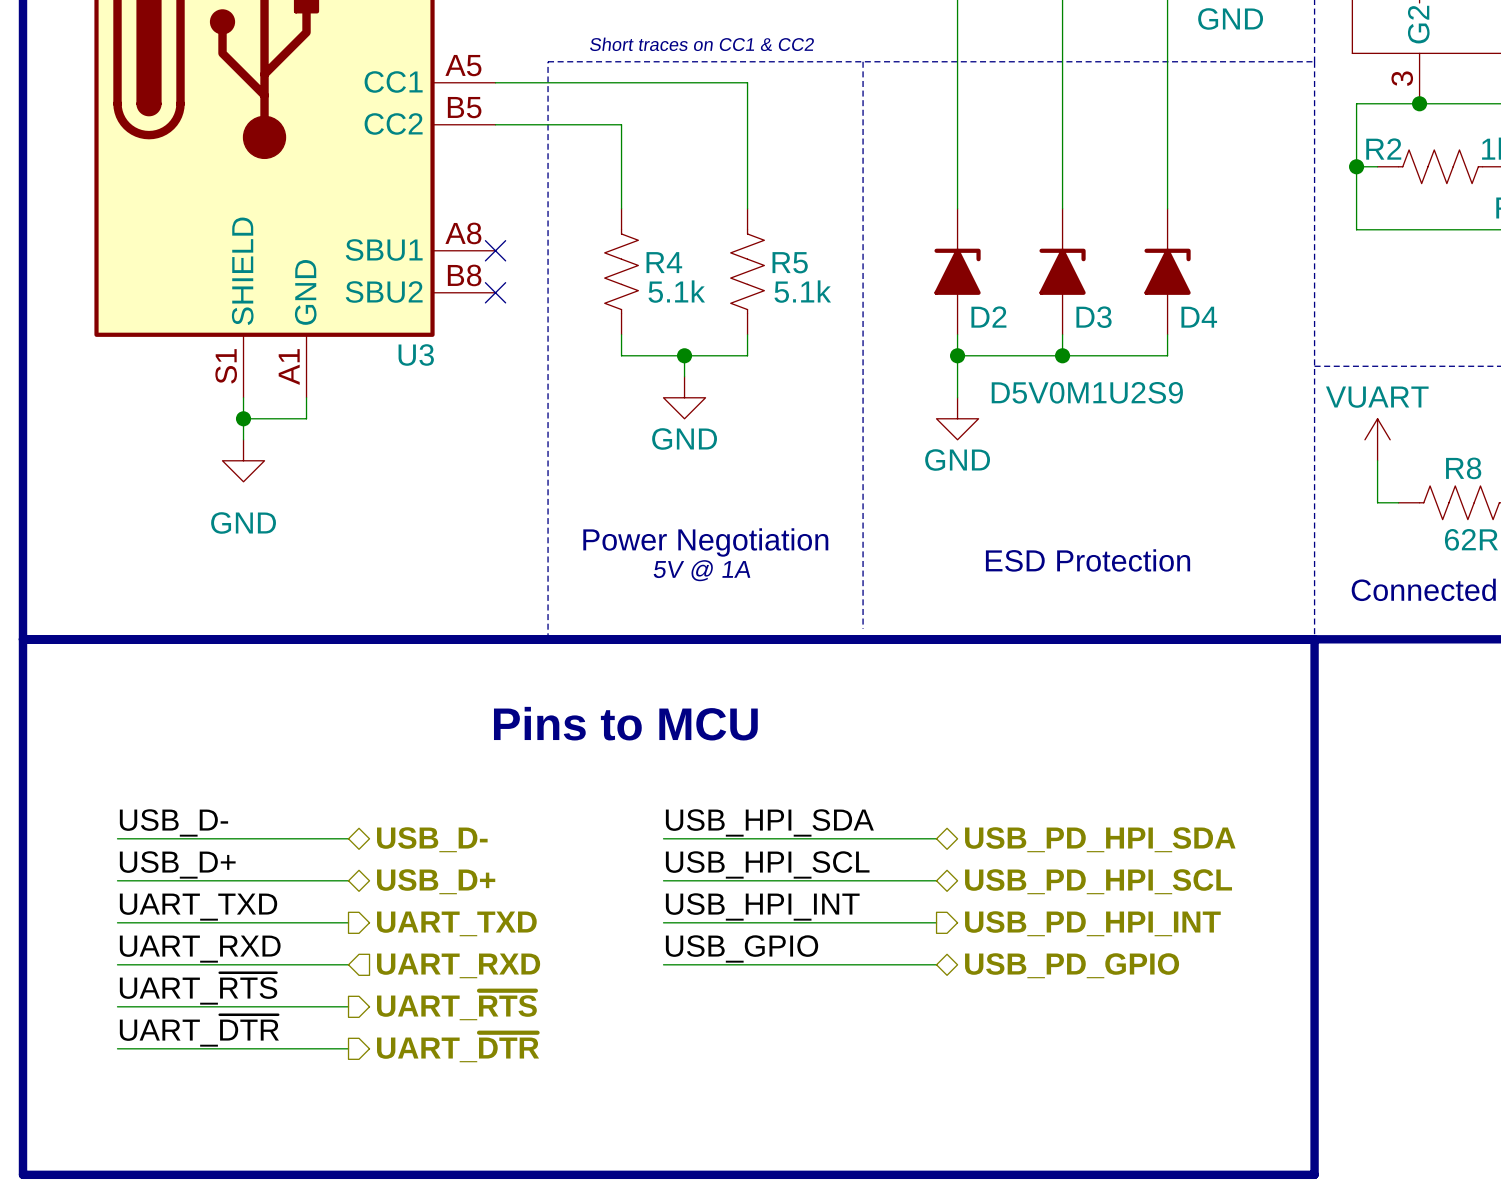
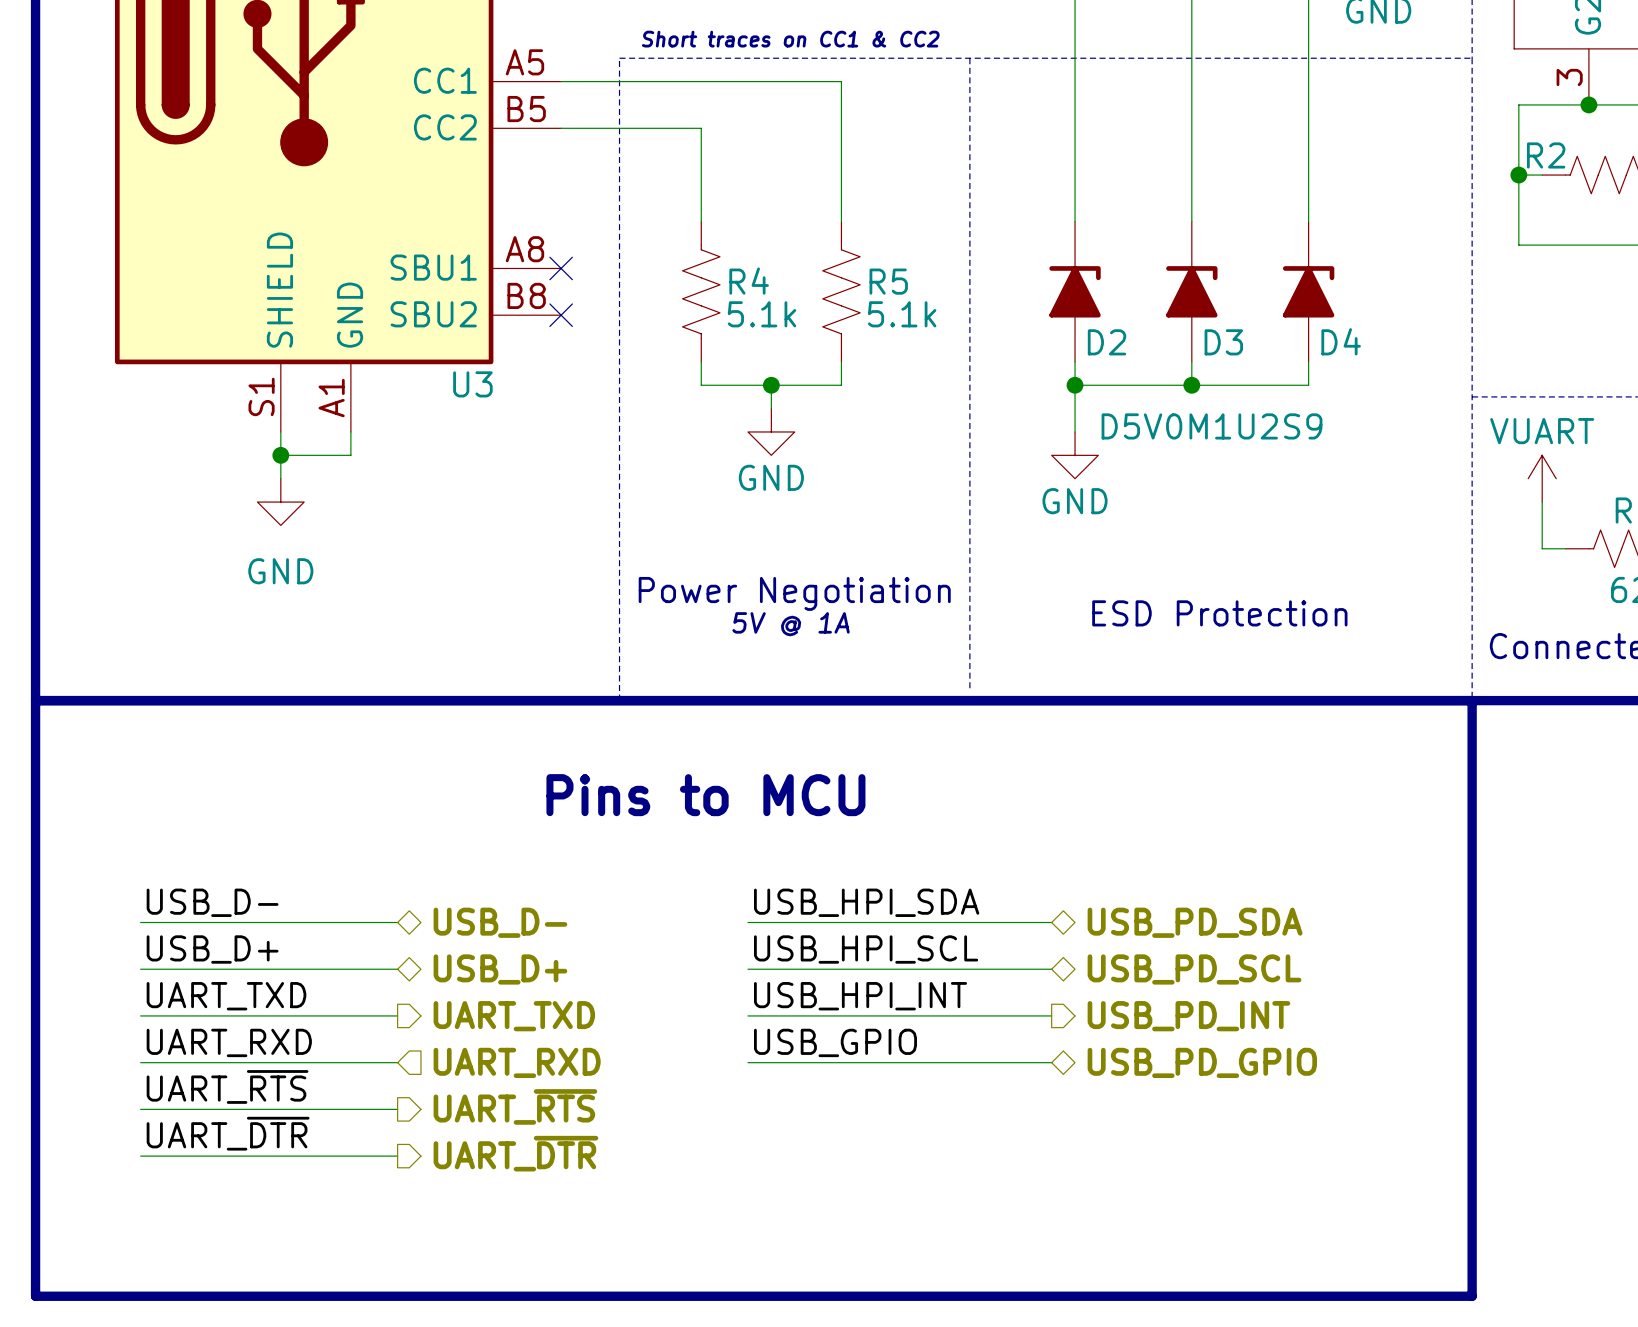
hierarchical label: USB_PD_HPI_SDA (1100, 839) -> USB_PD_SDA (1195, 922)
hierarchical label: USB_PD_HPI_SCL (1098, 881) -> USB_PD_SCL (1194, 969)
hierarchical label: USB_PD_HPI_INT (1092, 923) -> USB_PD_INT (1188, 1016)

